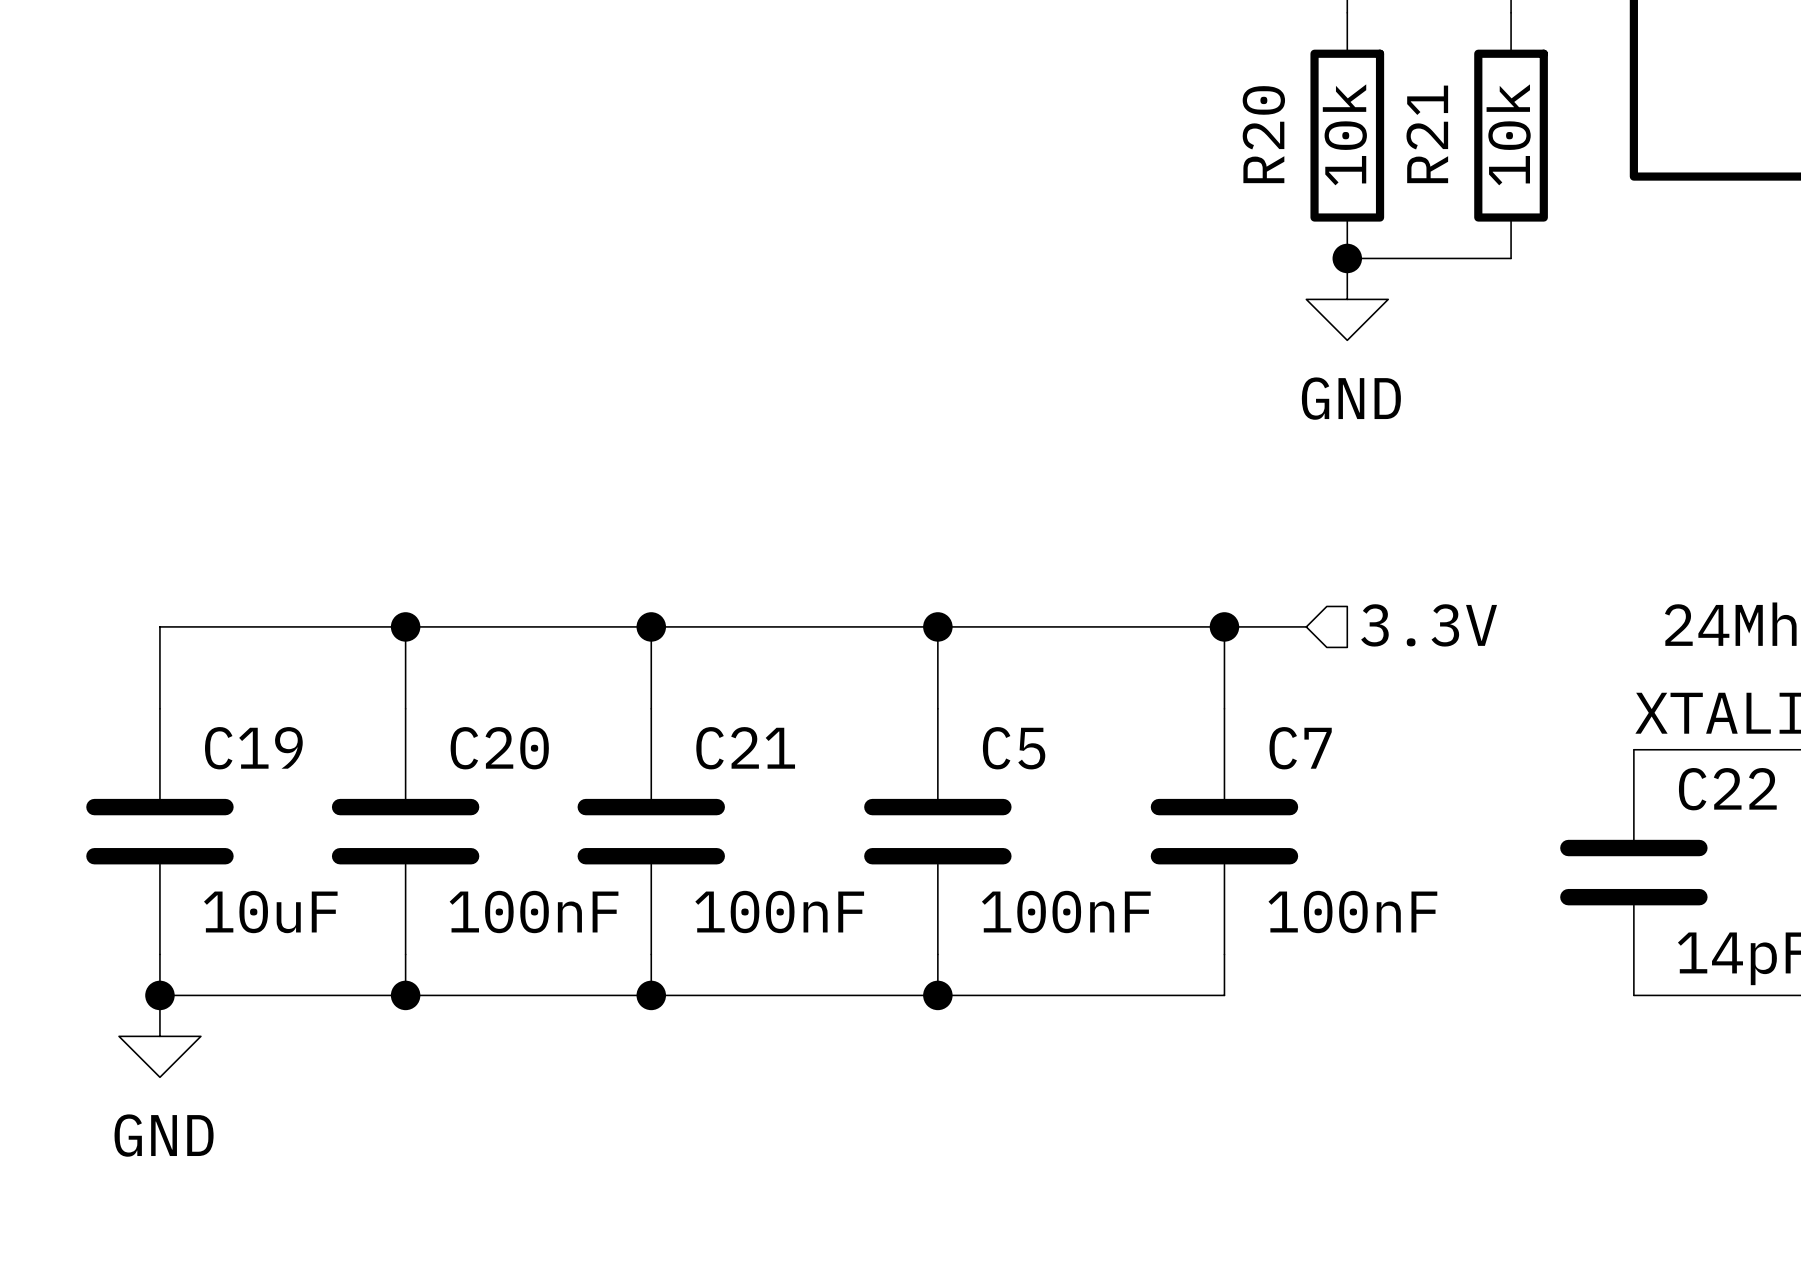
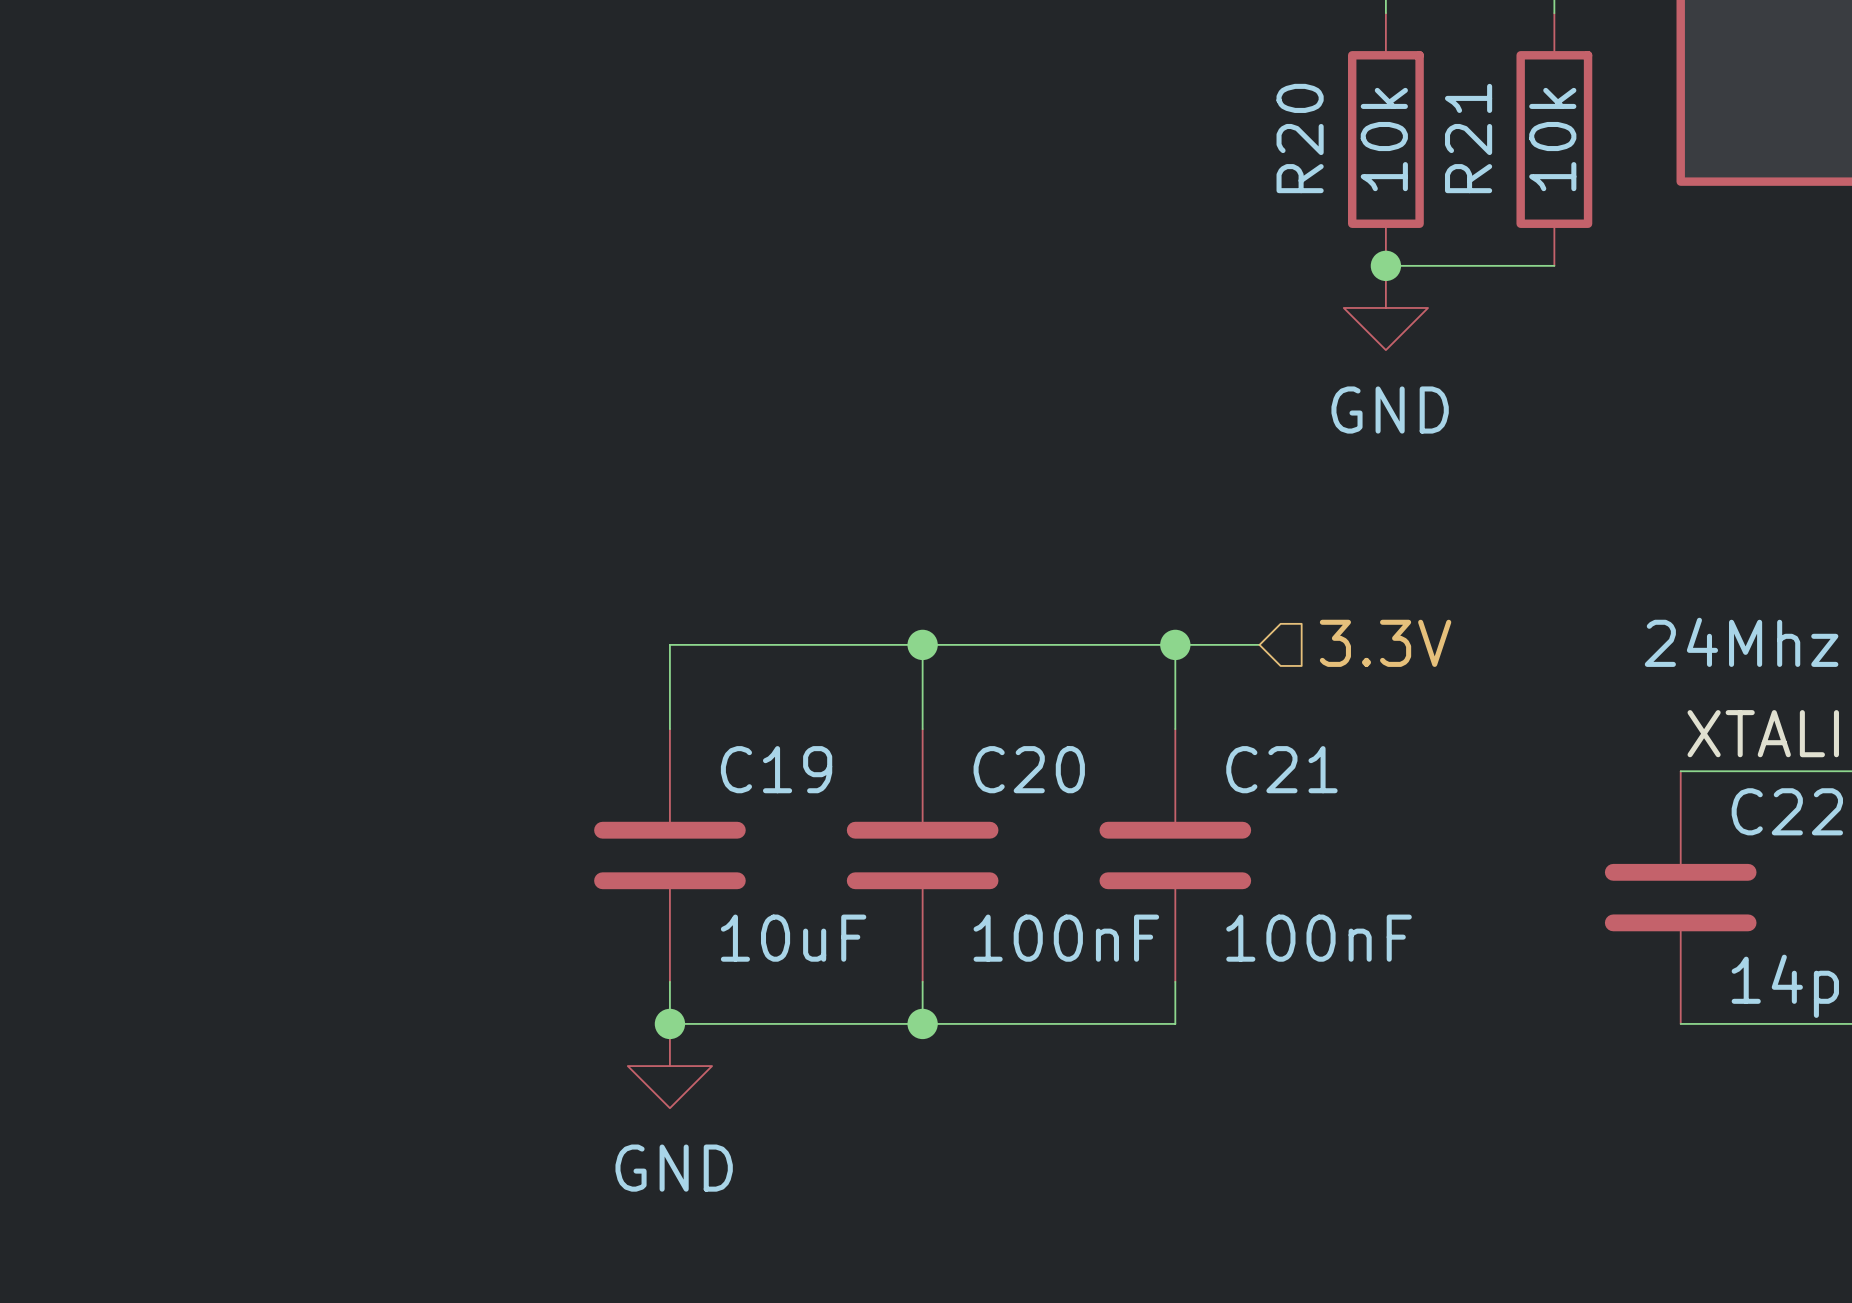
hierarchical label position: 3.3V (1429, 625) -> 3.3V (1385, 643)
wire: (405, 626) (405, 708) -> (1175, 644) (1175, 729)
junction: (405, 626) -> none
wire: (651, 626) (159, 626) (159, 708) -> none
junction: (651, 626) -> none
wire: (937, 626) (937, 708) -> (922, 644) (922, 729)
junction position: (937, 626) -> (922, 644)
junction position: (1224, 626) -> (1175, 644)
wire: (1306, 626) (1224, 626) (1224, 708) -> none
C21 name: C21 (745, 748) -> C19 (776, 769)
C19: 10uF (159, 831) -> none
C20 position: (405, 831) -> (922, 855)
C5: 100nF (937, 831) -> none
C21: none -> 100nF (1175, 855)
C7: 100nF (1224, 831) -> none
C21 value: 100nF (779, 912) -> 10uF (793, 938)
wire: (159, 954) (159, 995) (651, 995) -> none
wire: (405, 954) (405, 995) -> none
wire: (937, 954) (937, 995) -> (922, 981) (922, 1023)
wire: (1224, 954) (1224, 995) (1142, 995) -> (1175, 981) (1175, 1023)
junction: (159, 995) -> none
junction: (405, 995) -> none
junction position: (937, 995) -> (922, 1023)
power symbol position: GND (159, 1036) -> GND (669, 1066)

